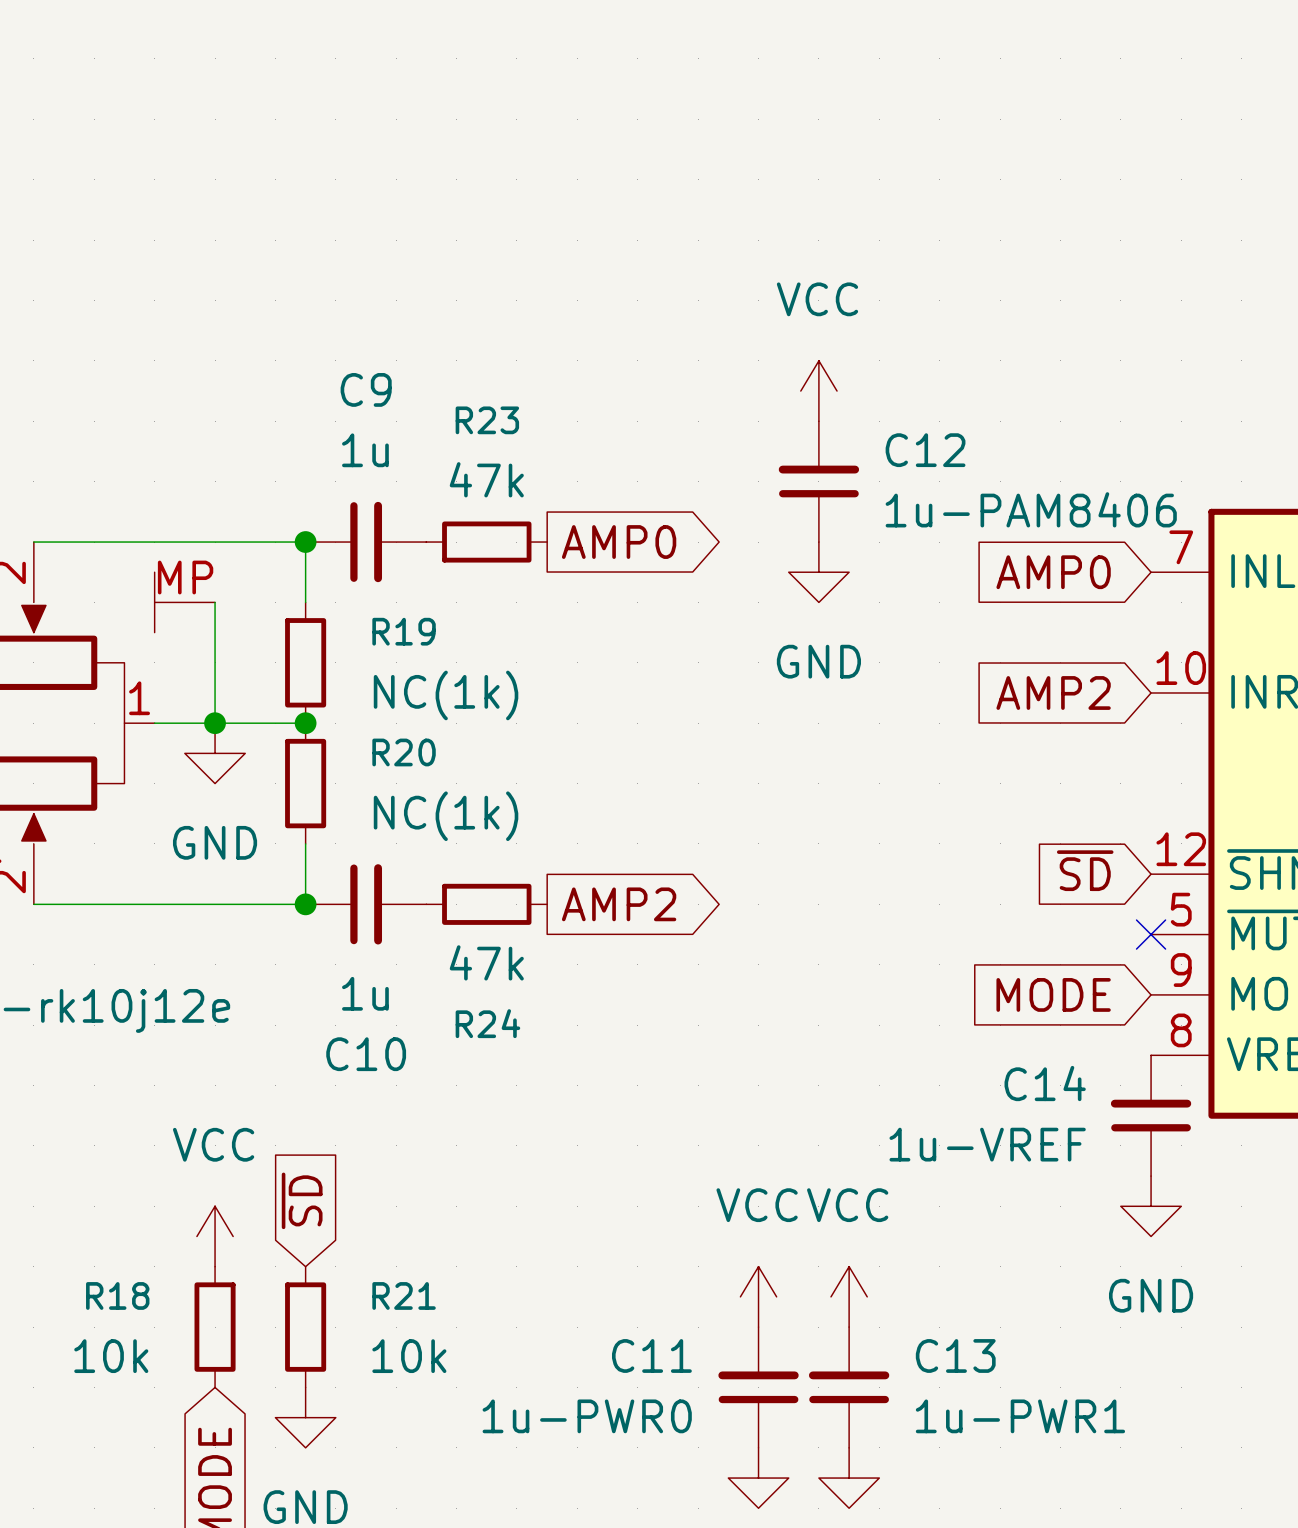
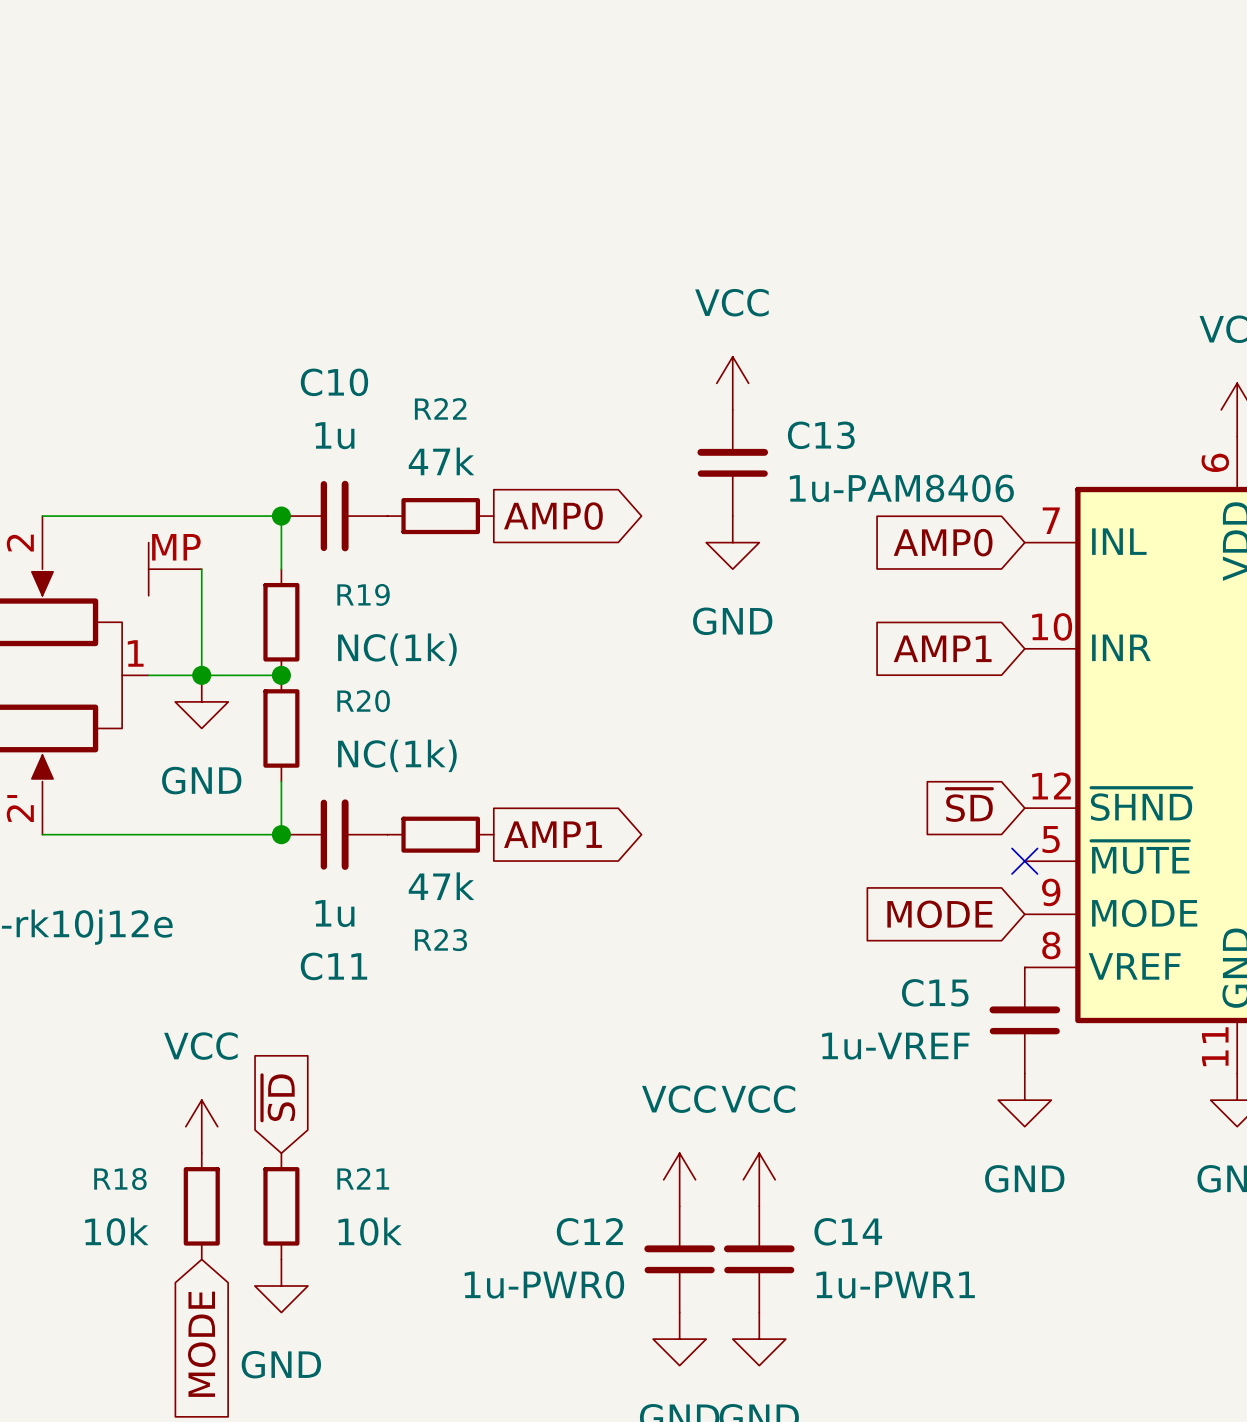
C9 name: C9 (366, 389) -> C10 (334, 382)
R23 name: R23 (487, 420) -> R22 (440, 408)
C12 name: C12 (925, 450) -> C13 (821, 435)
global label: AMP2 (1053, 692) -> AMP1 (942, 648)
global label: AMP2 (619, 904) -> AMP1 (552, 834)
R24 name: R24 (487, 1023) -> R23 (440, 940)
C10 name: C10 (366, 1054) -> C11 (333, 966)
C14 name: C14 (1045, 1083) -> C15 (935, 992)
C11 name: C11 (651, 1355) -> C12 (589, 1231)
C13 name: C13 (955, 1355) -> C14 (848, 1231)

